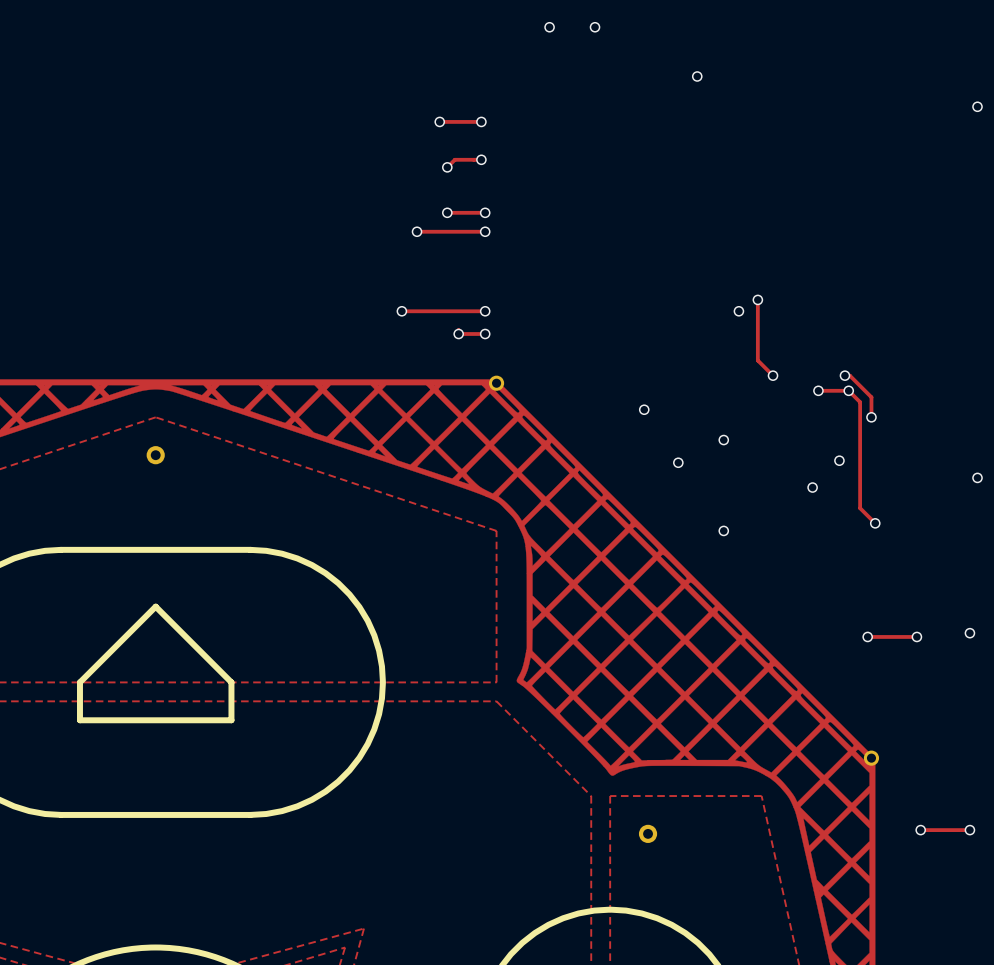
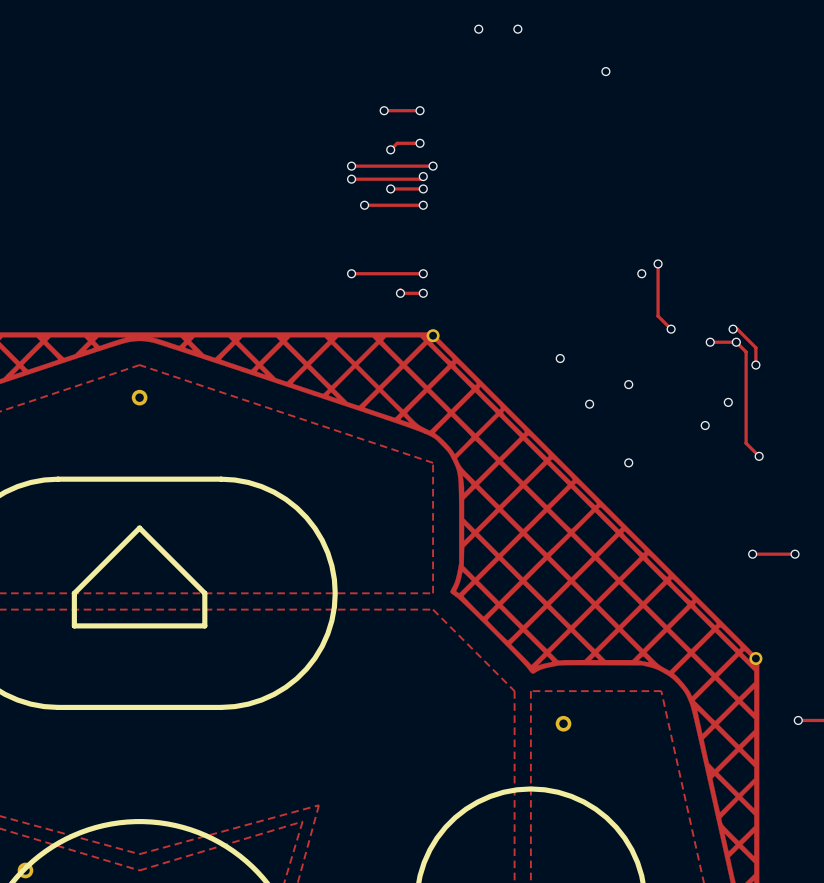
track: none -> (351, 166) (433, 166)
via: none -> (351, 166)
via: none -> (433, 166)
track: none -> (423, 176) (420, 179) (351, 179)
via: none -> (423, 176)
via: none -> (351, 179)

